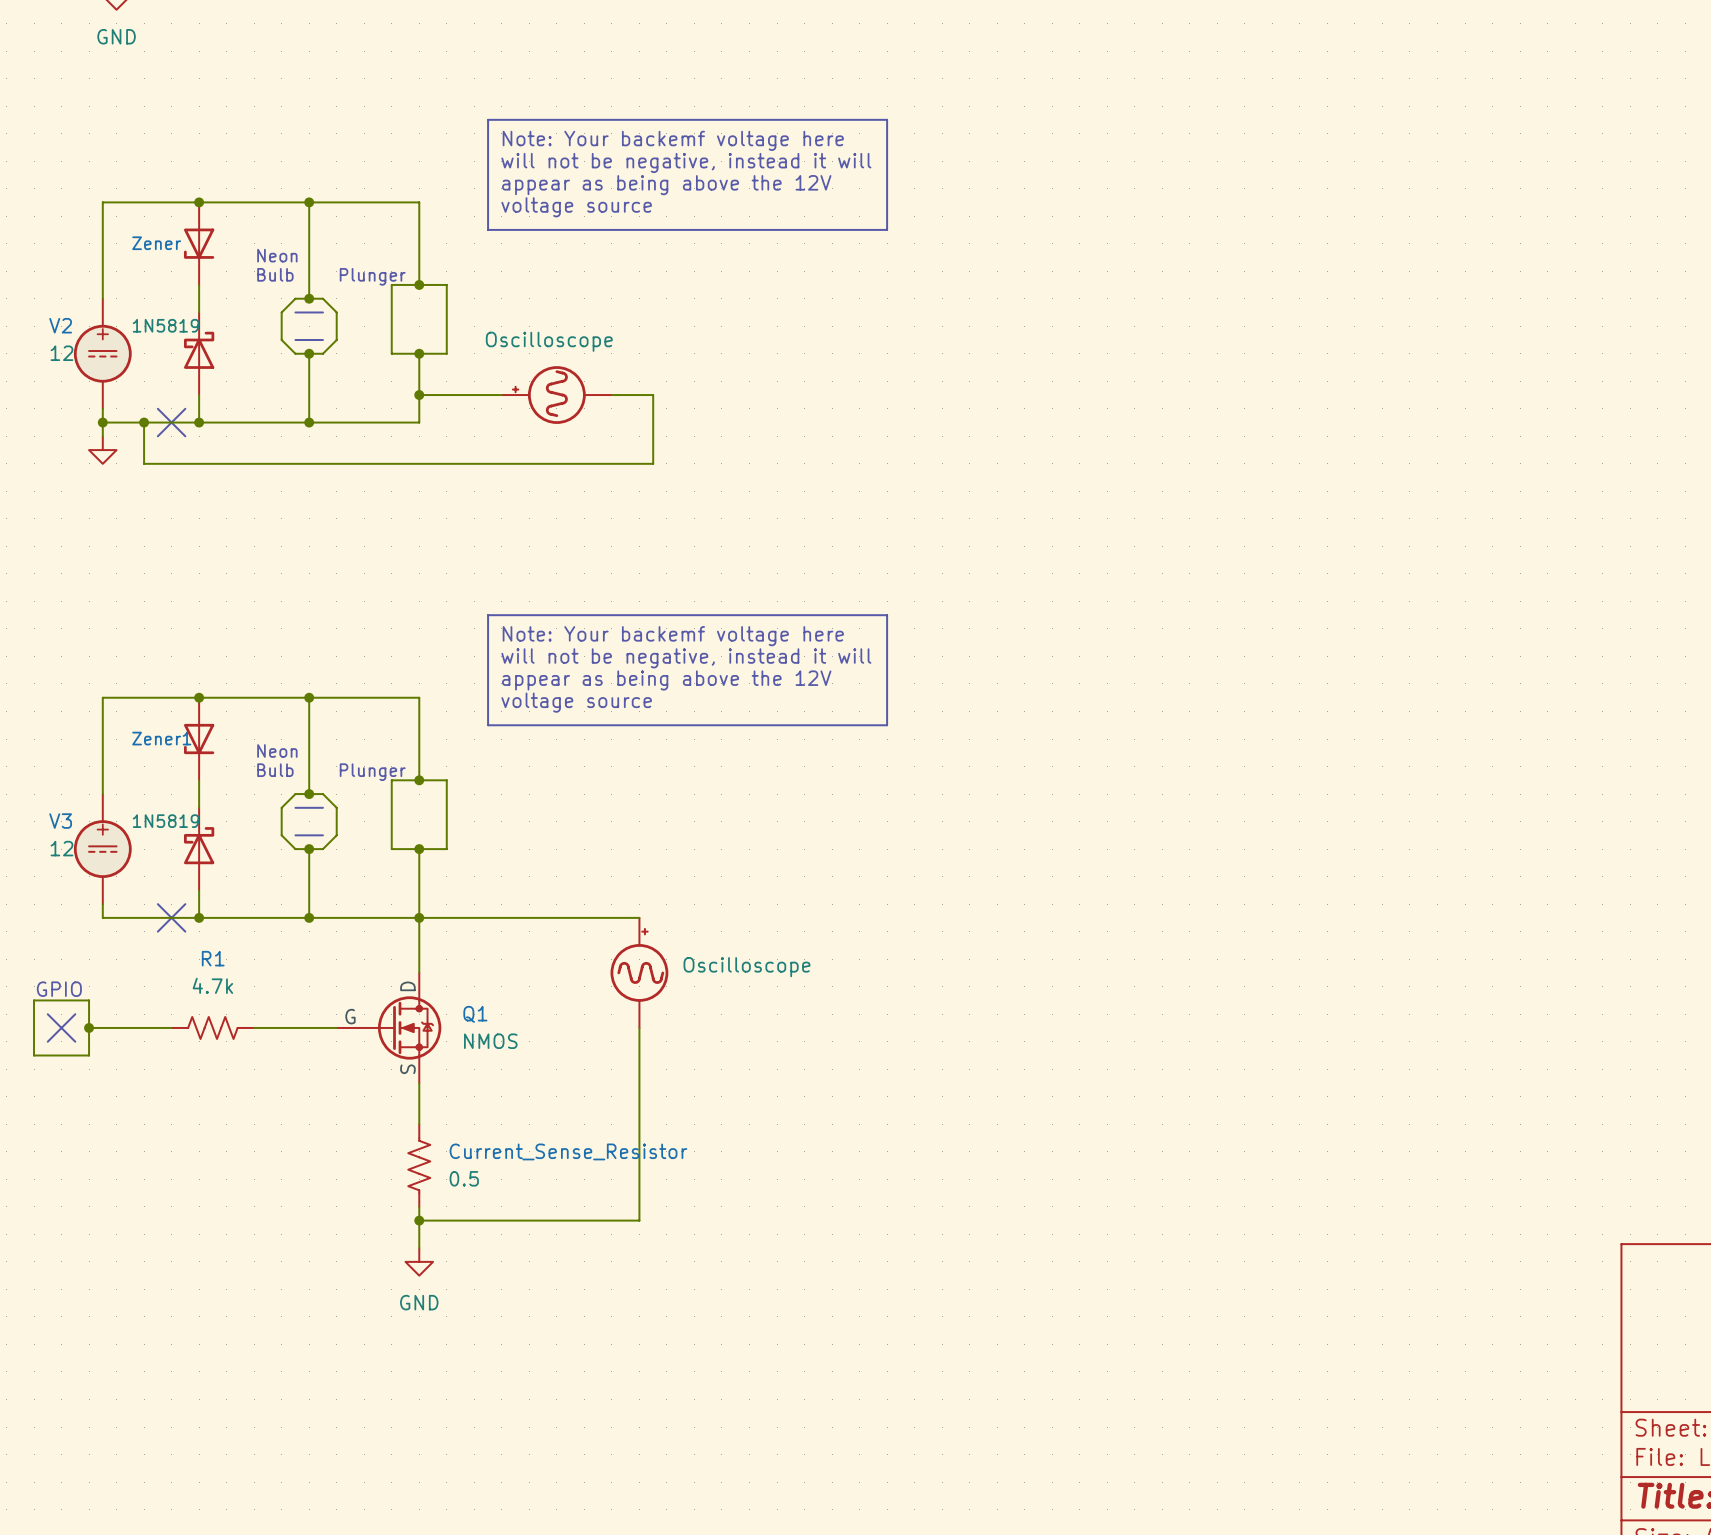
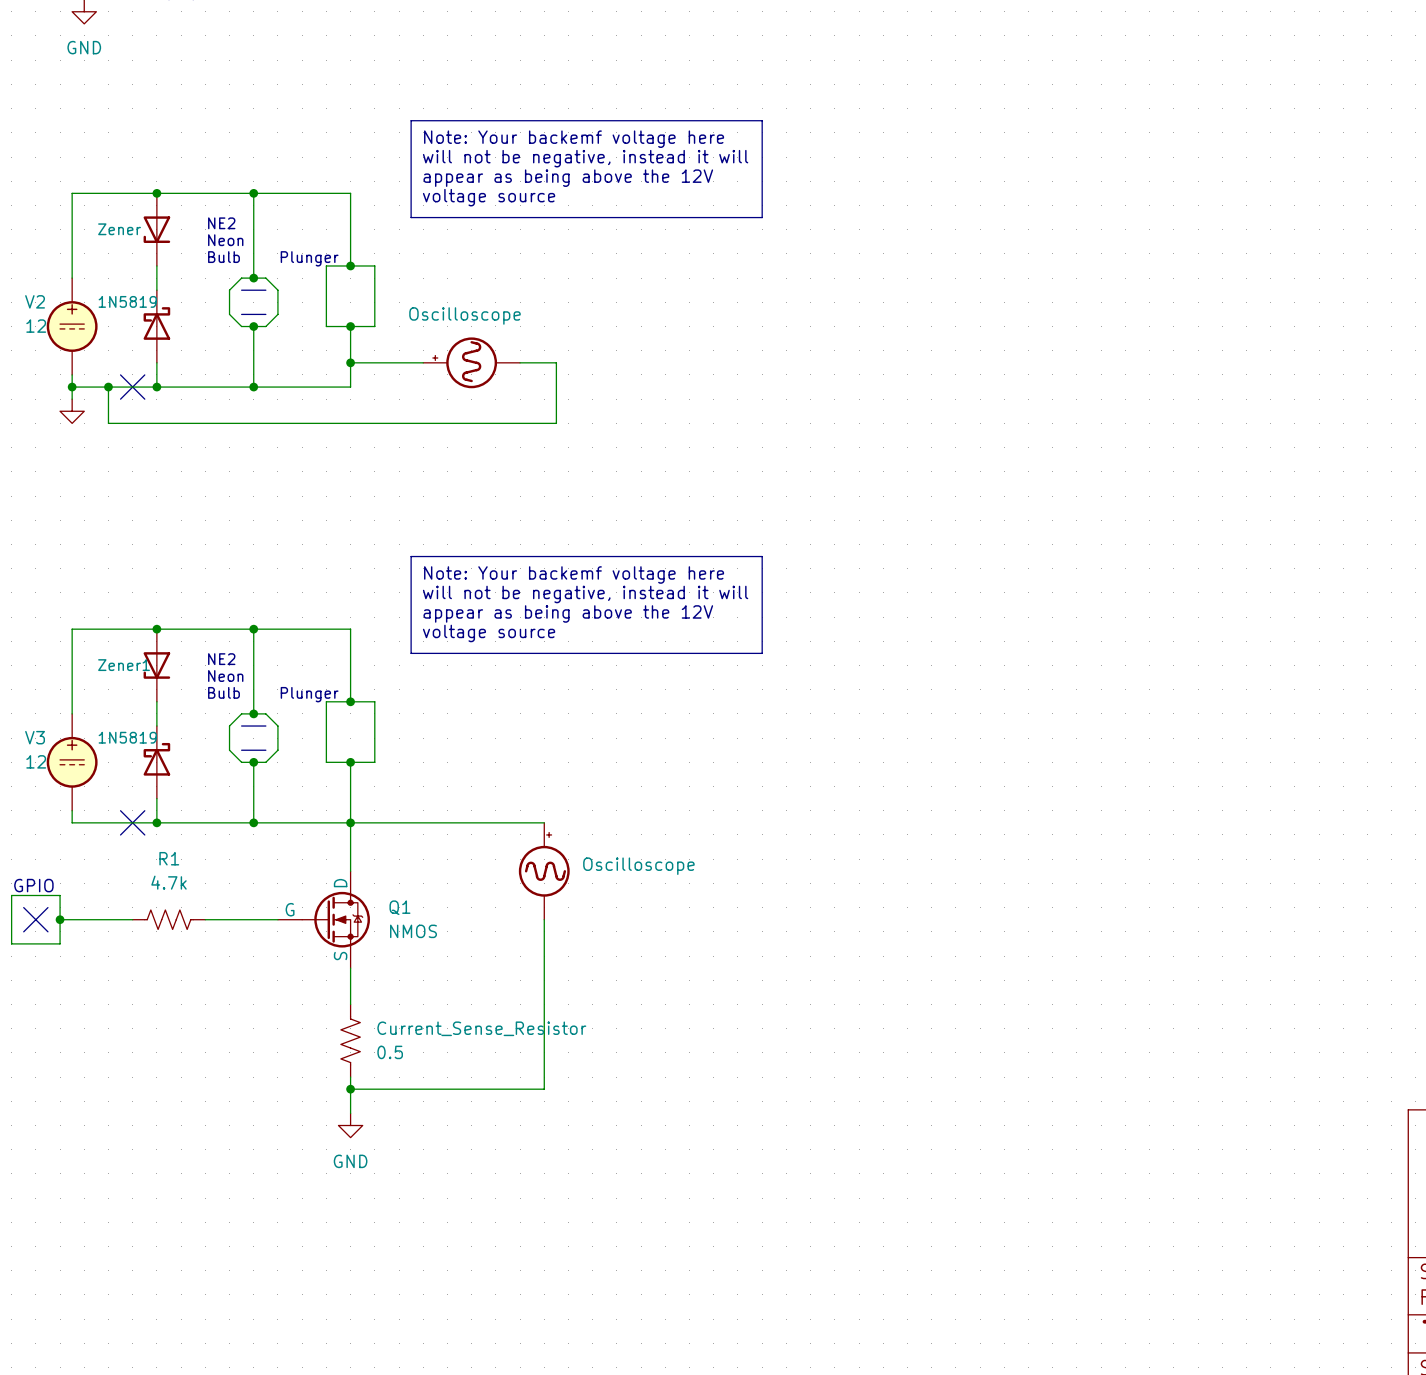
text: none -> NE2 (221, 223)
text: none -> NE2 (221, 659)

